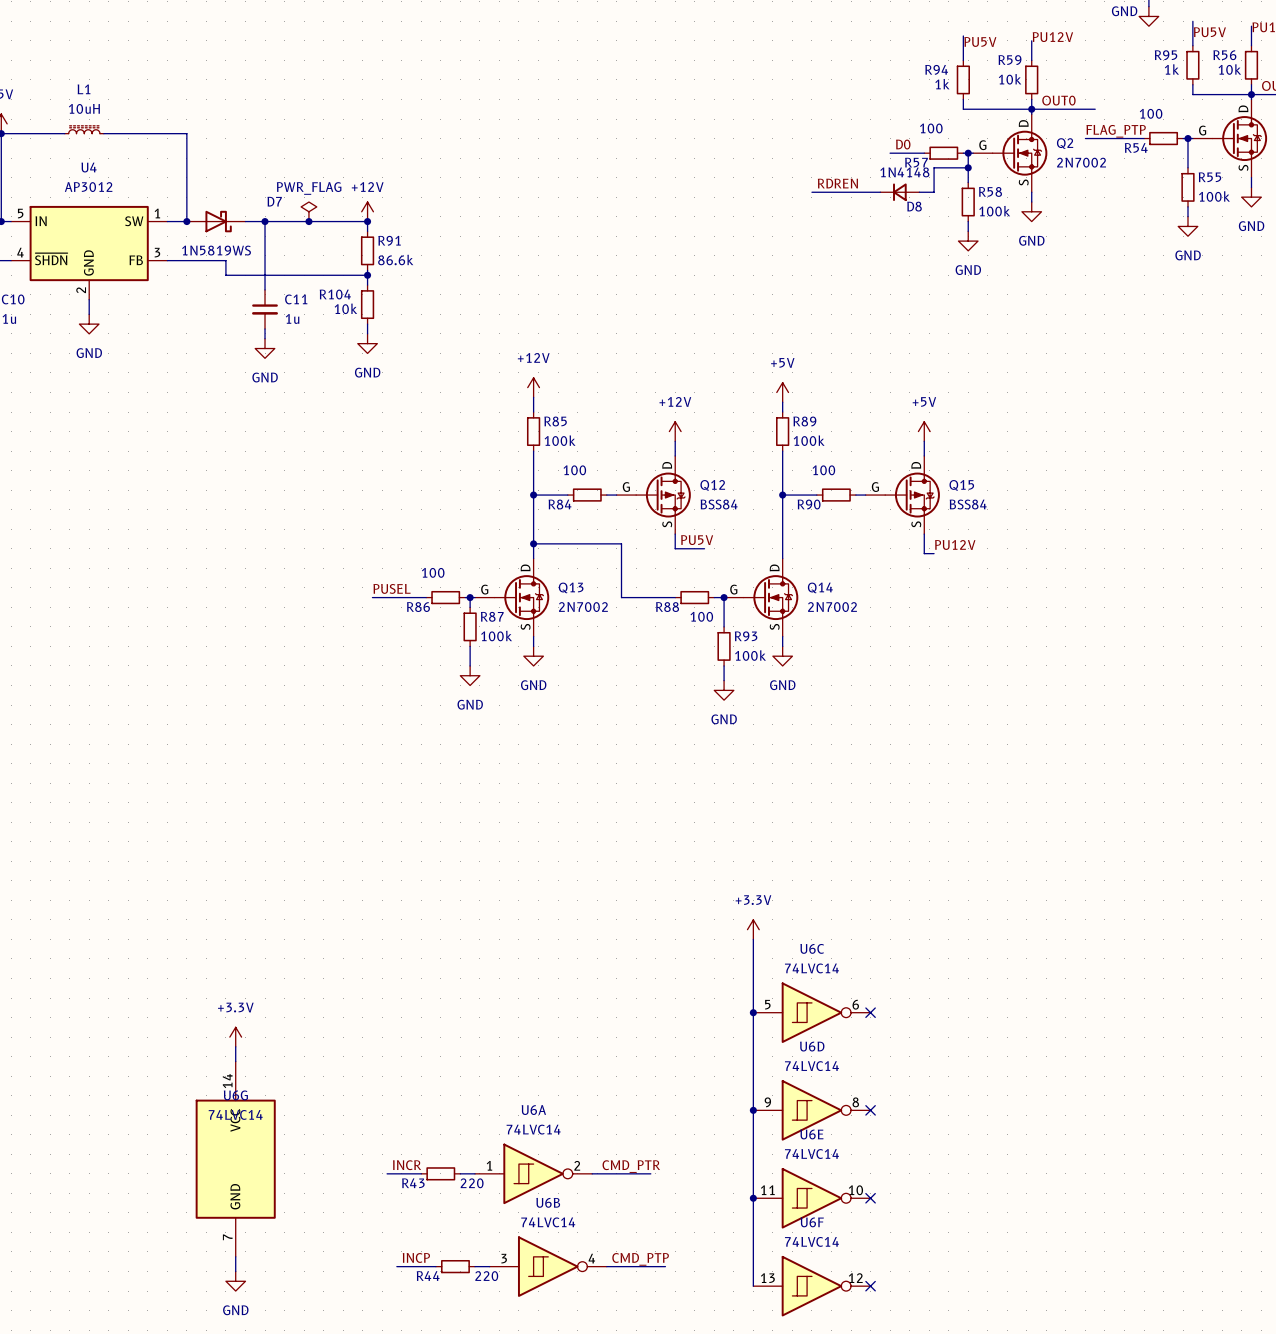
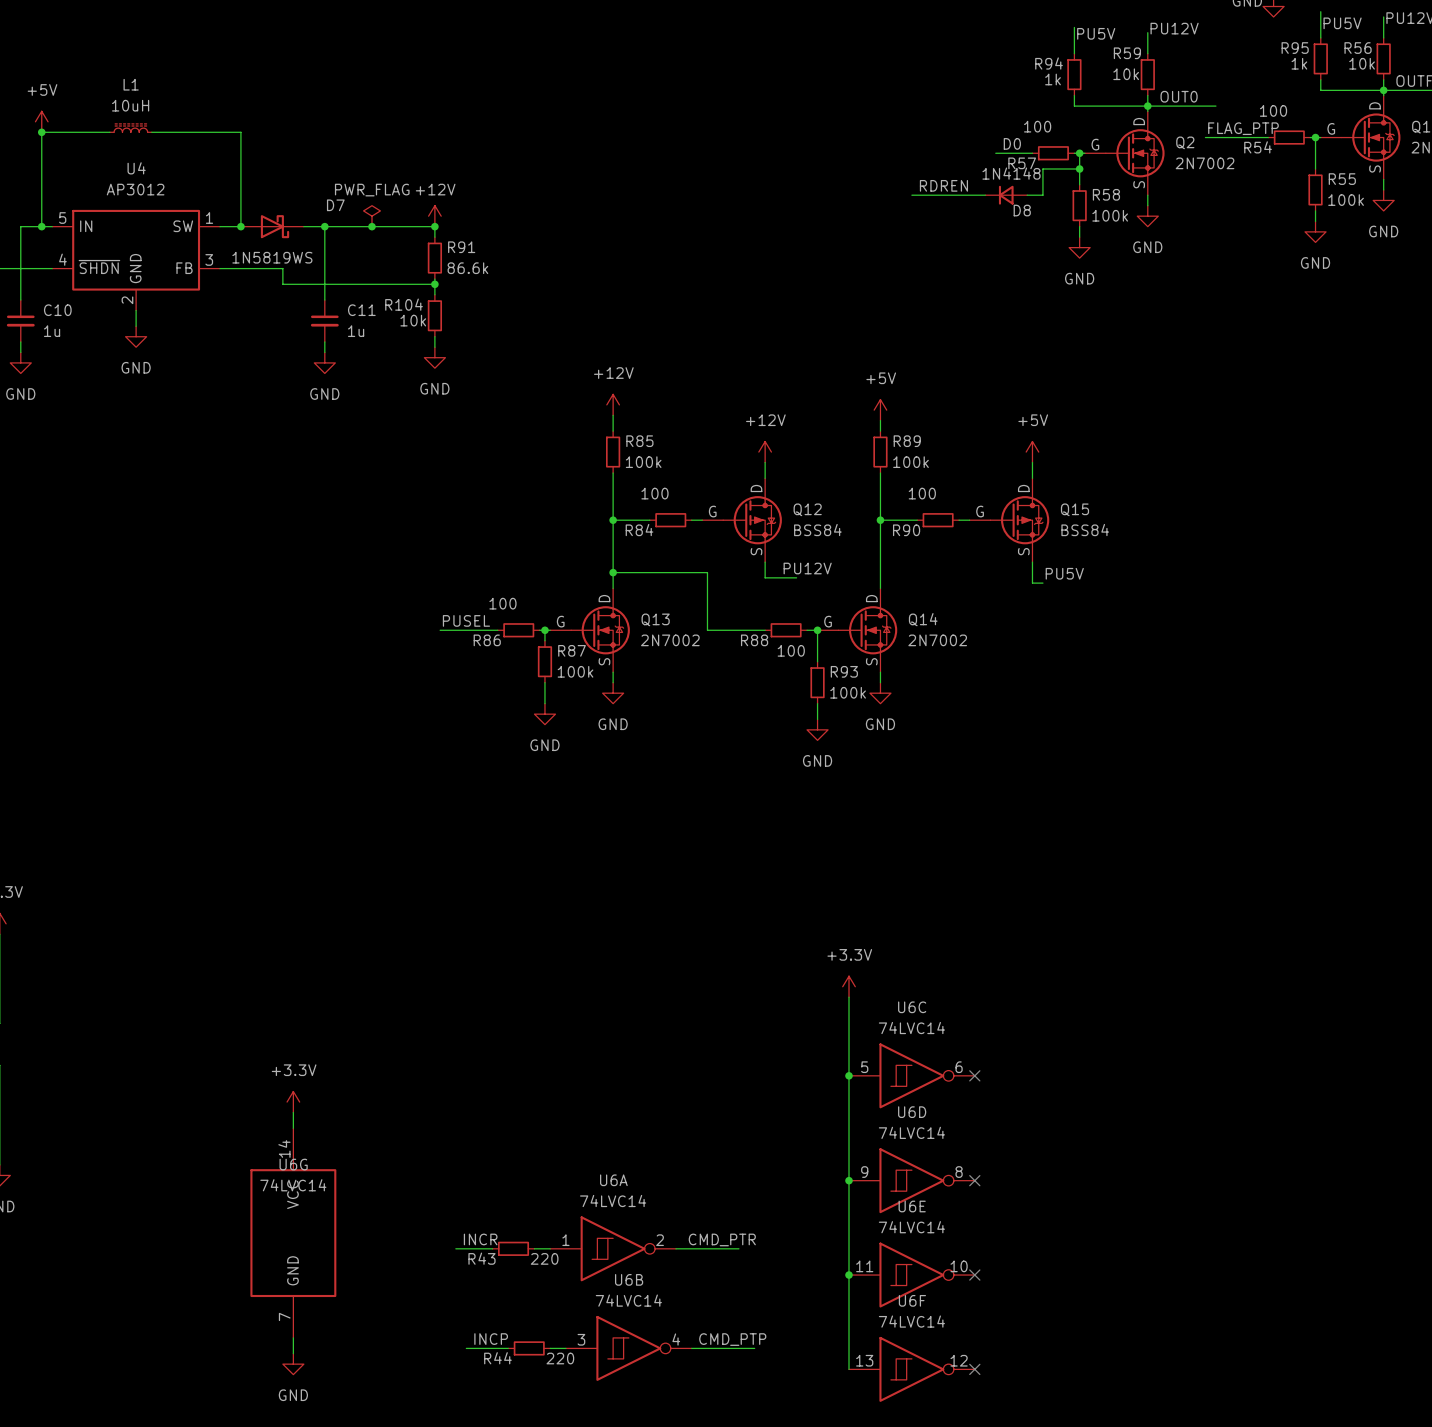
label: PU5V (697, 540) -> PU12V (807, 568)
label: PU12V (955, 544) -> PU5V (1064, 573)

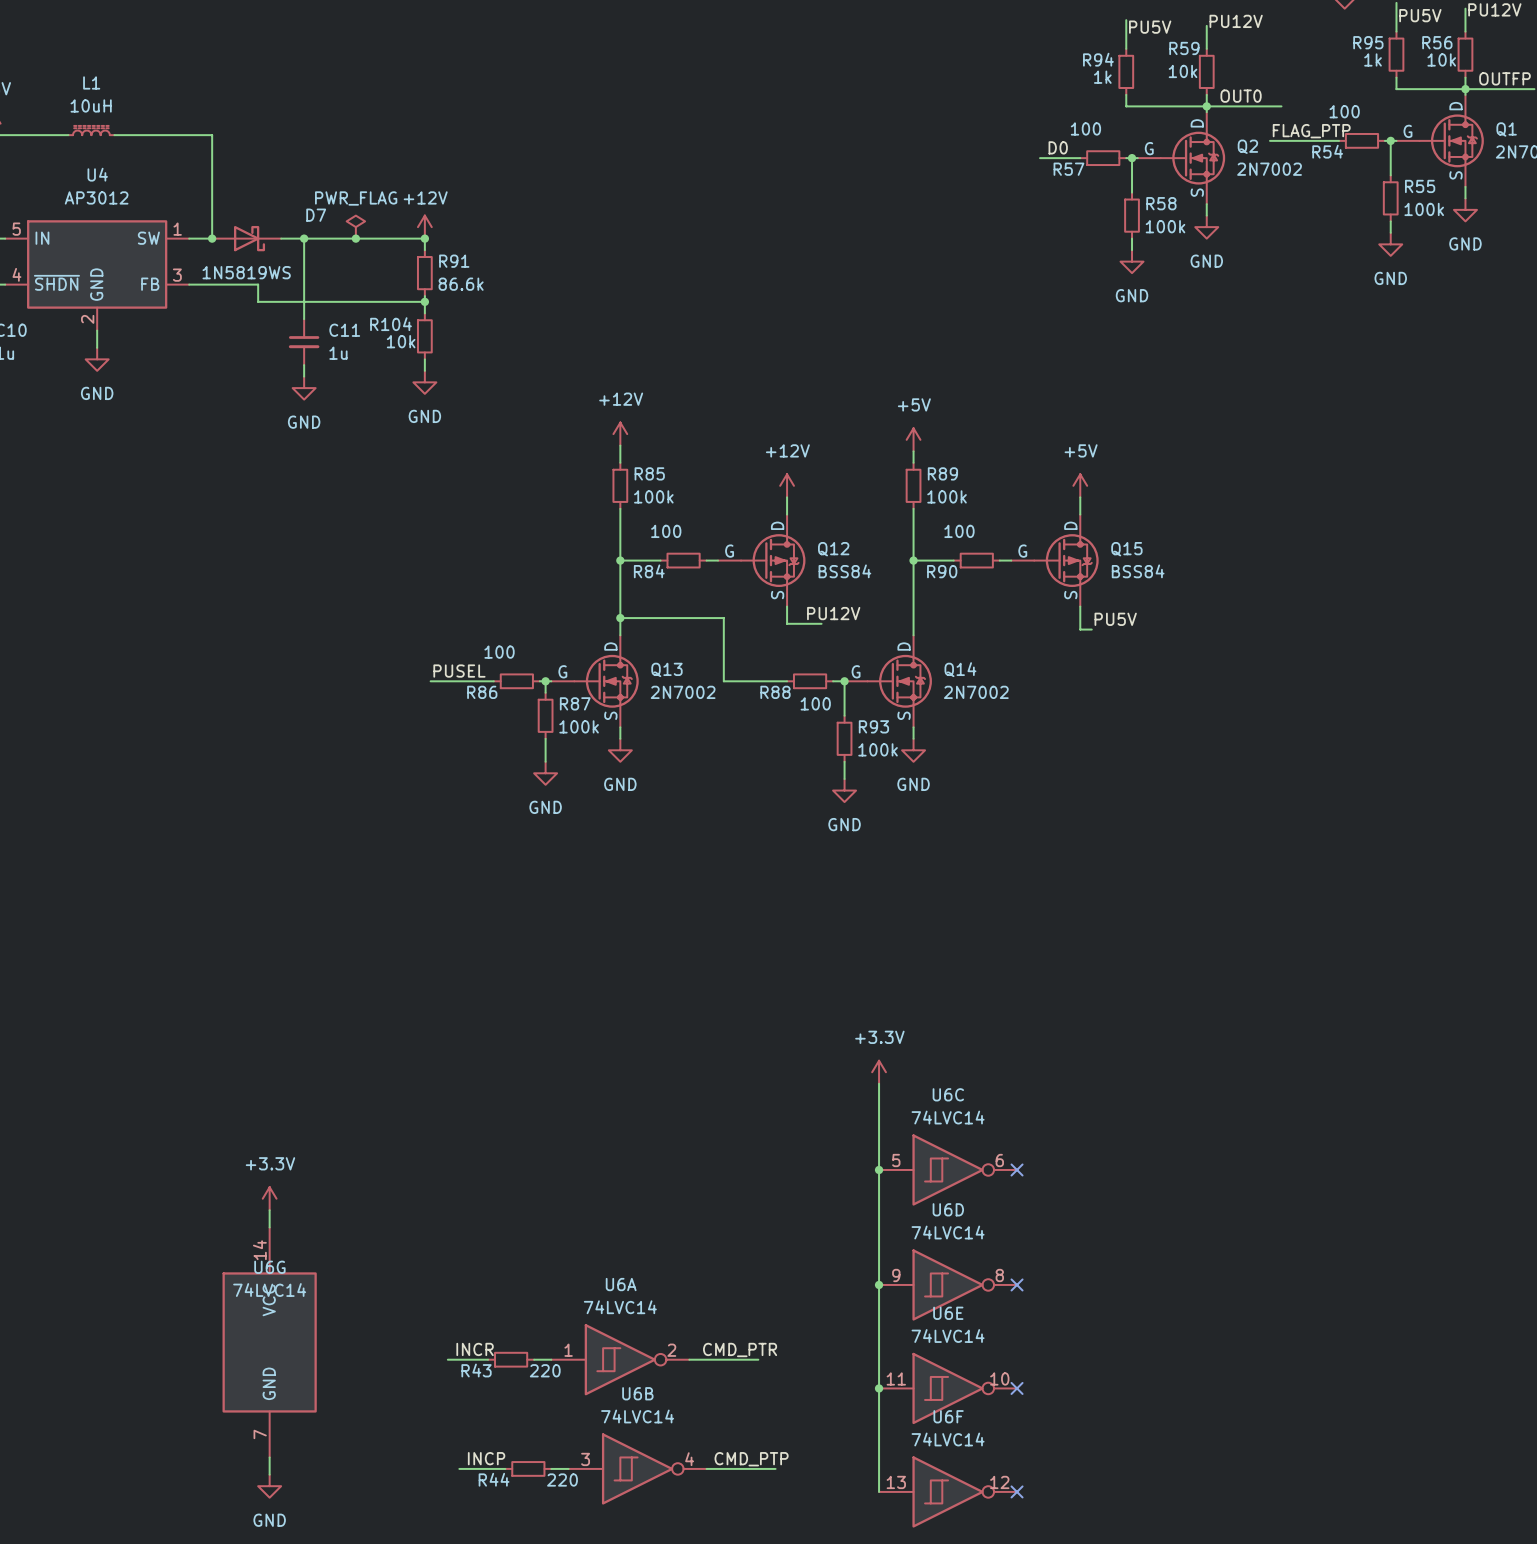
wire: (1079, 168) (1042, 168) (1042, 195) (1027, 195) -> none
junction: (1079, 168) -> none
label: RDREN (943, 185) -> none
wire: (911, 195) (985, 195) -> none
D8: 1N4148 (1006, 195) -> none

